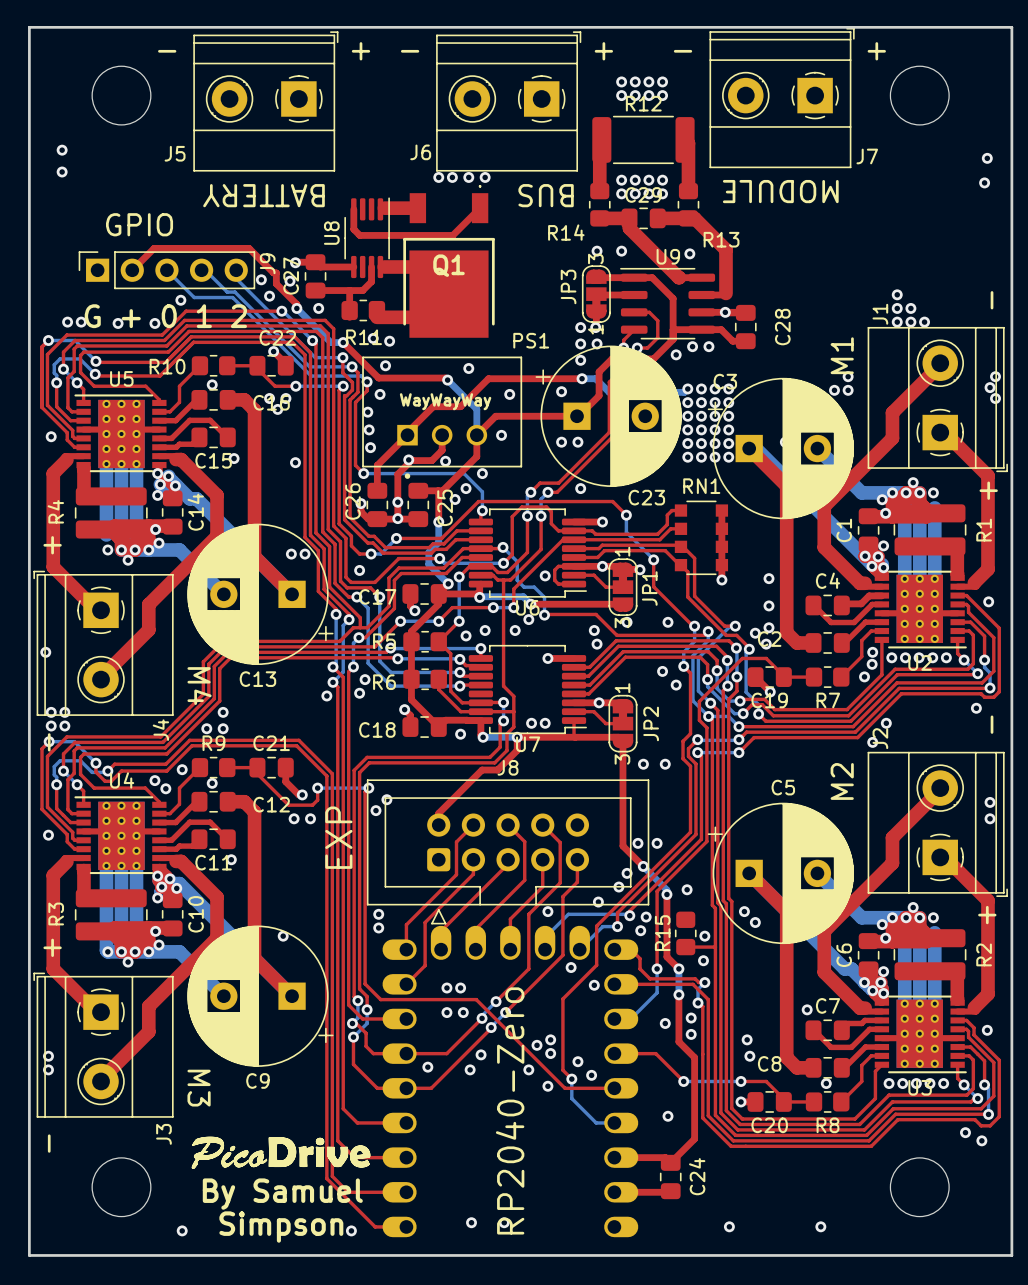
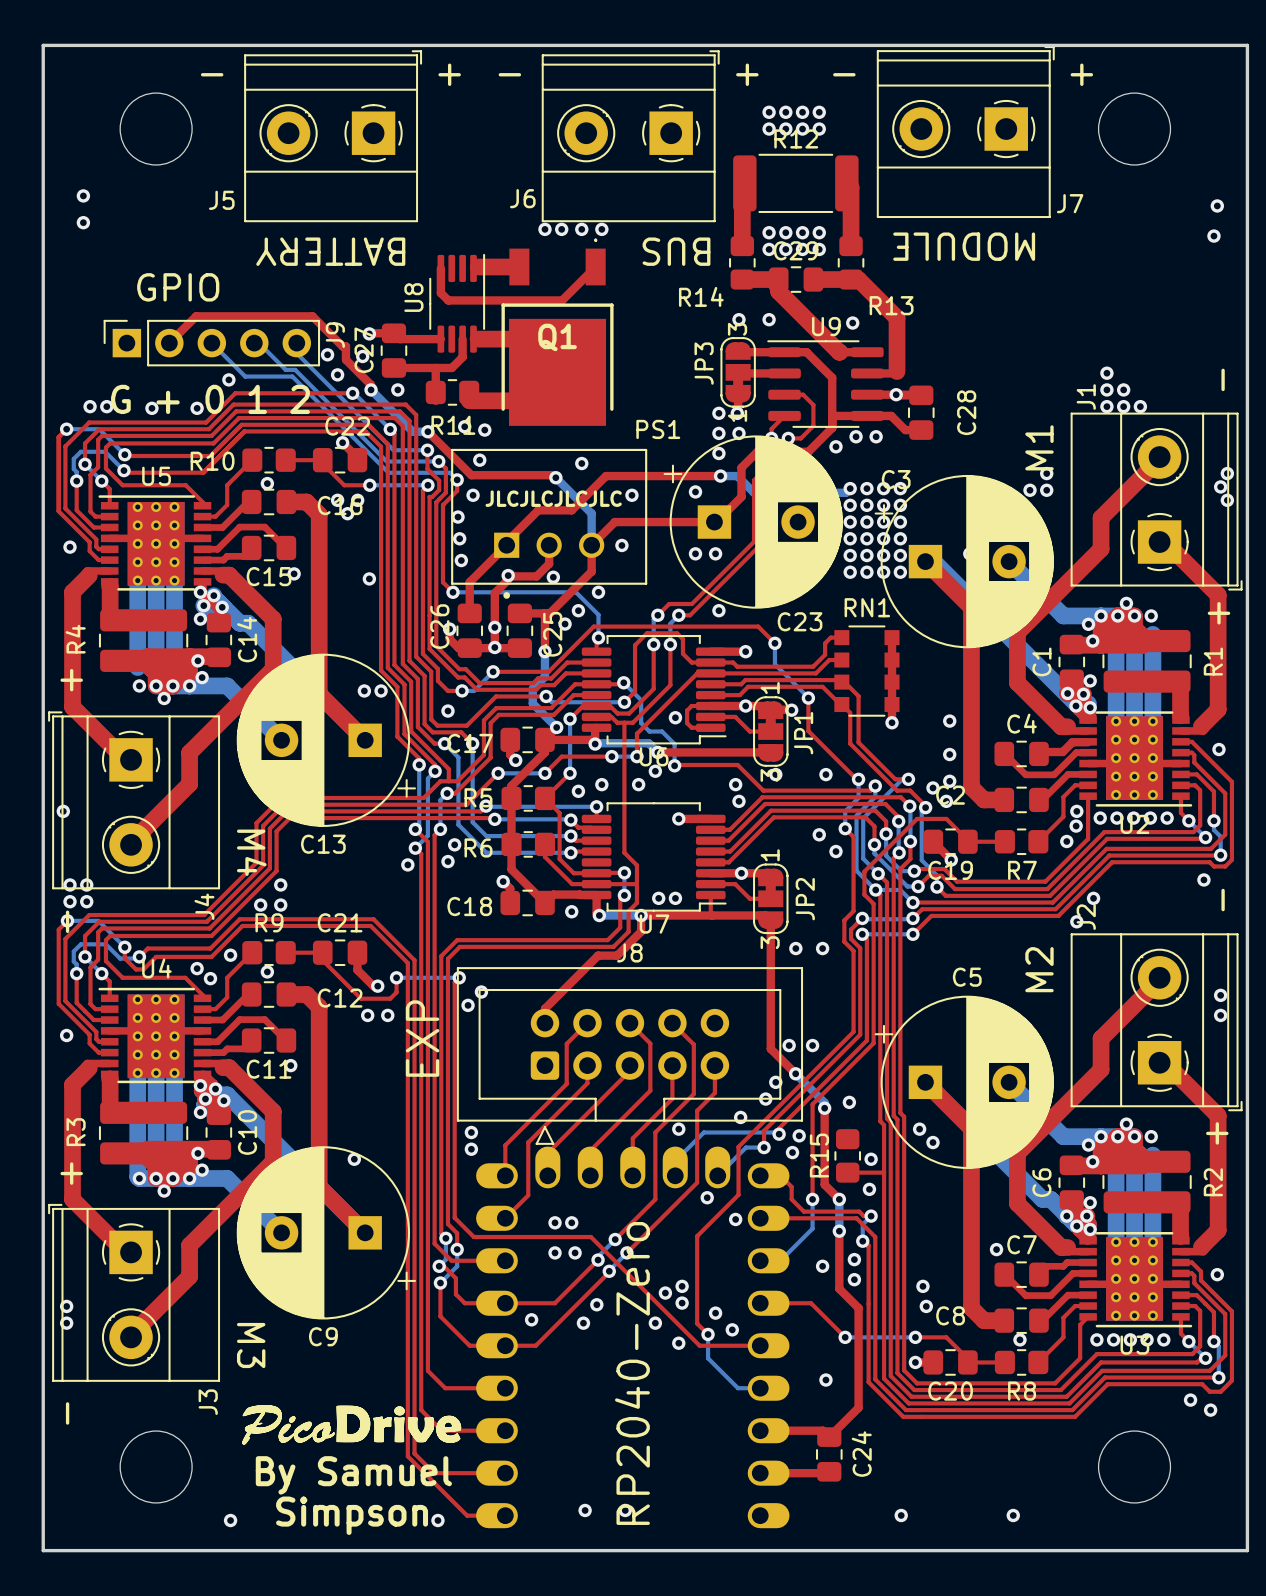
text: none -> JLCJLCJLCJLC (553, 498)
text: WayWayWay (445, 401) -> none

